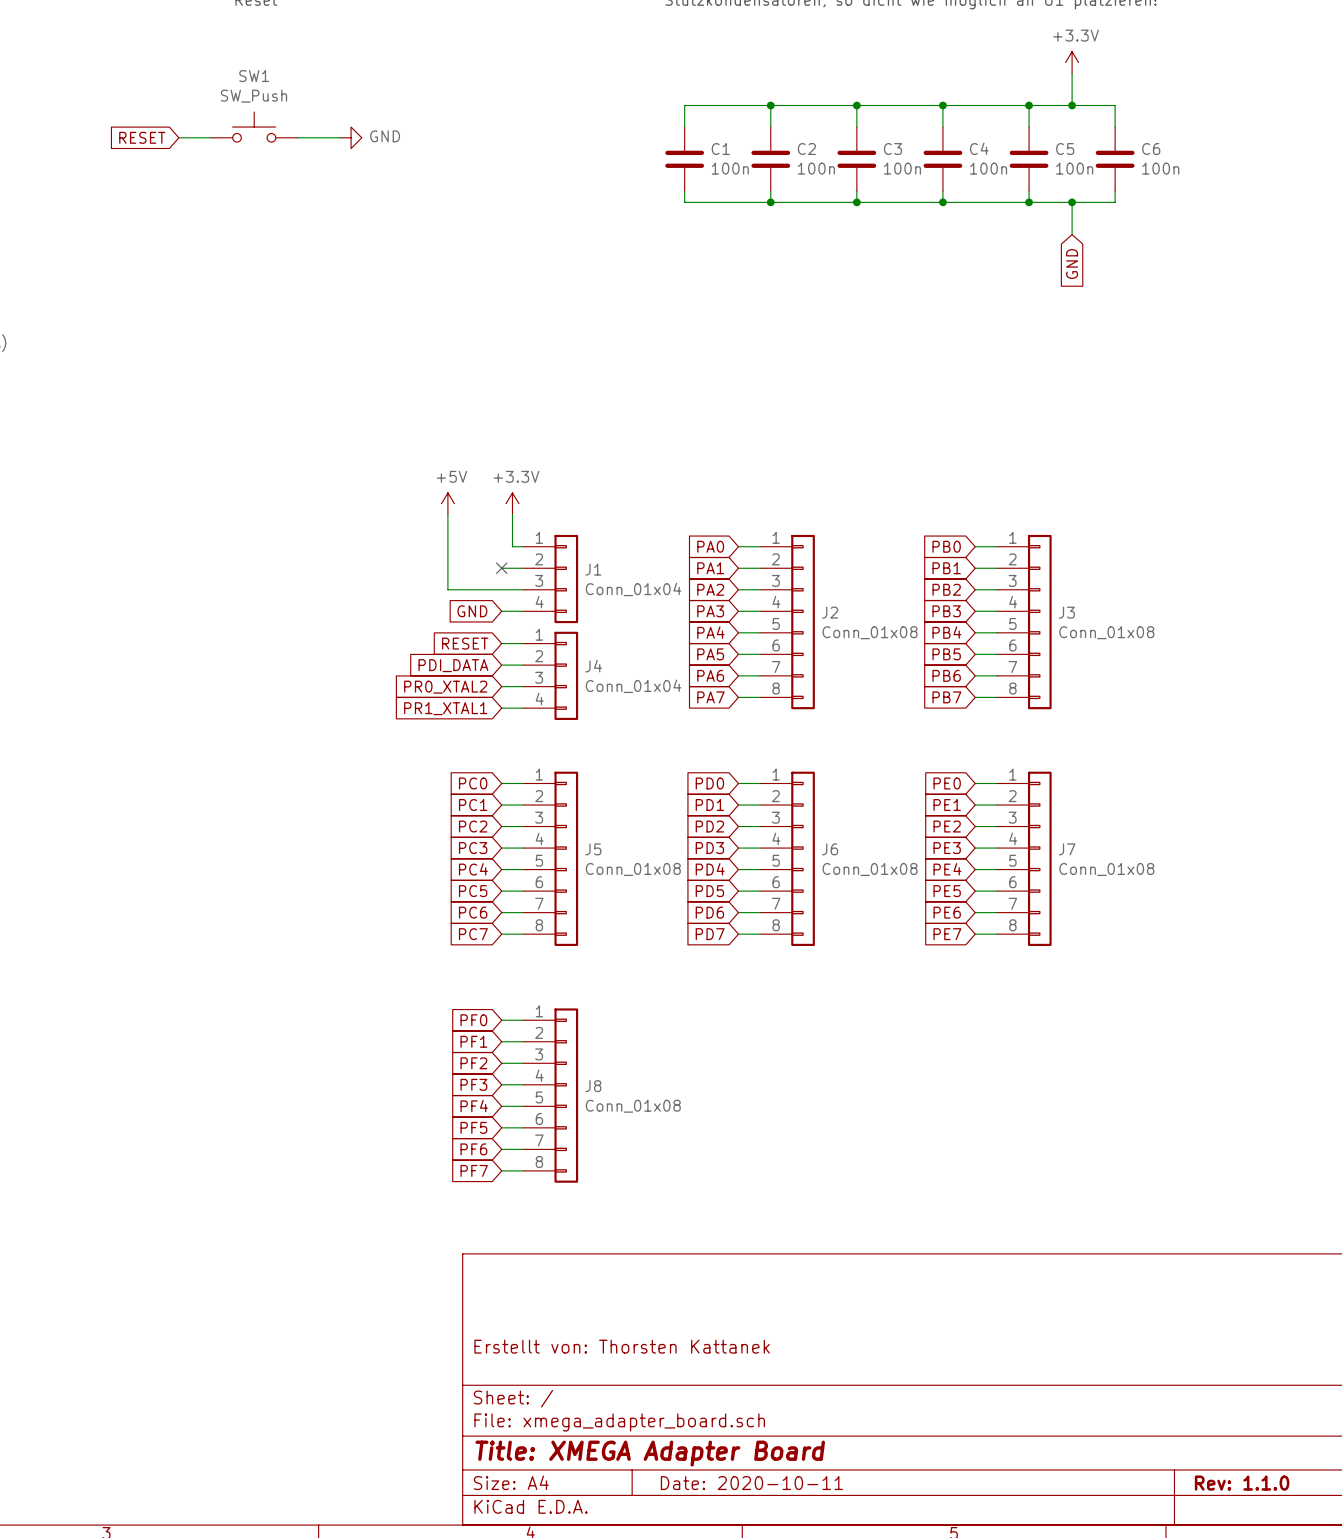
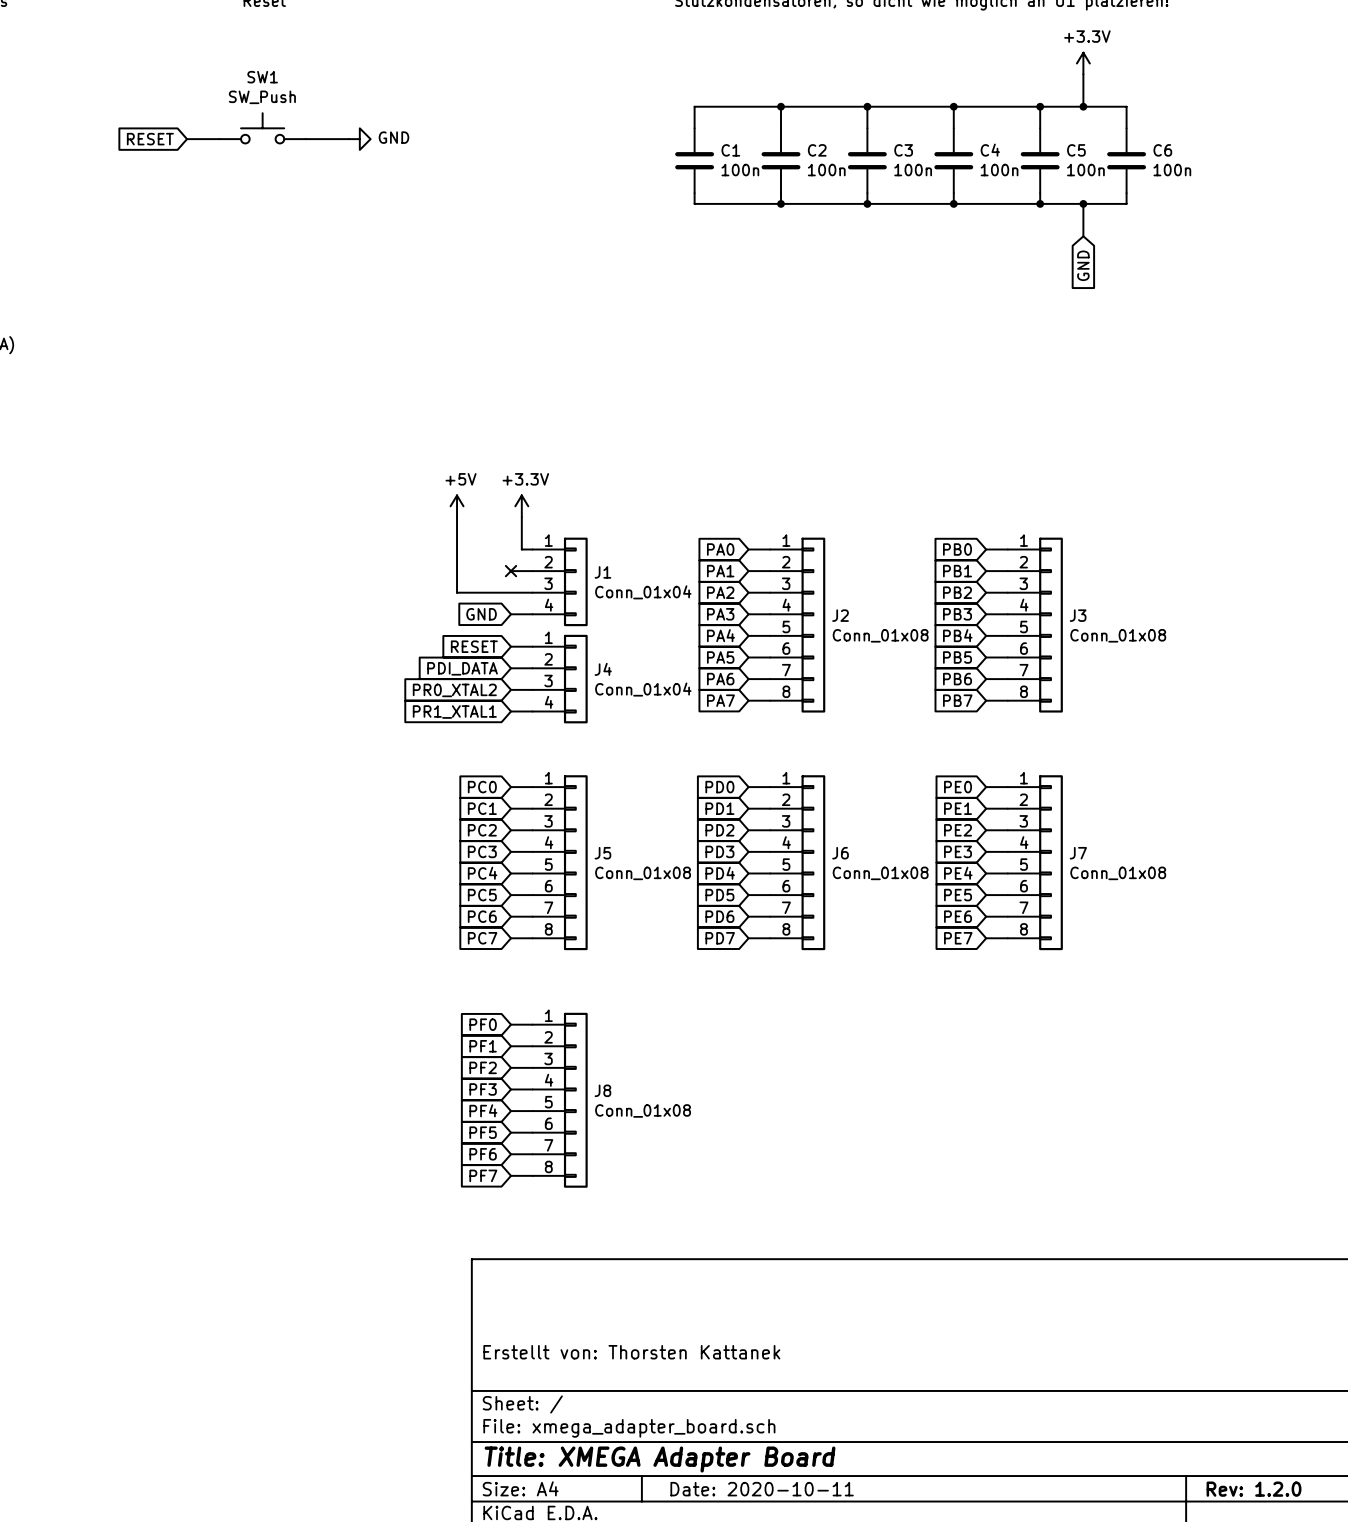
title block: Rev: 1.1.0 (1242, 1483) -> Rev: 1.2.0 (1254, 1489)

